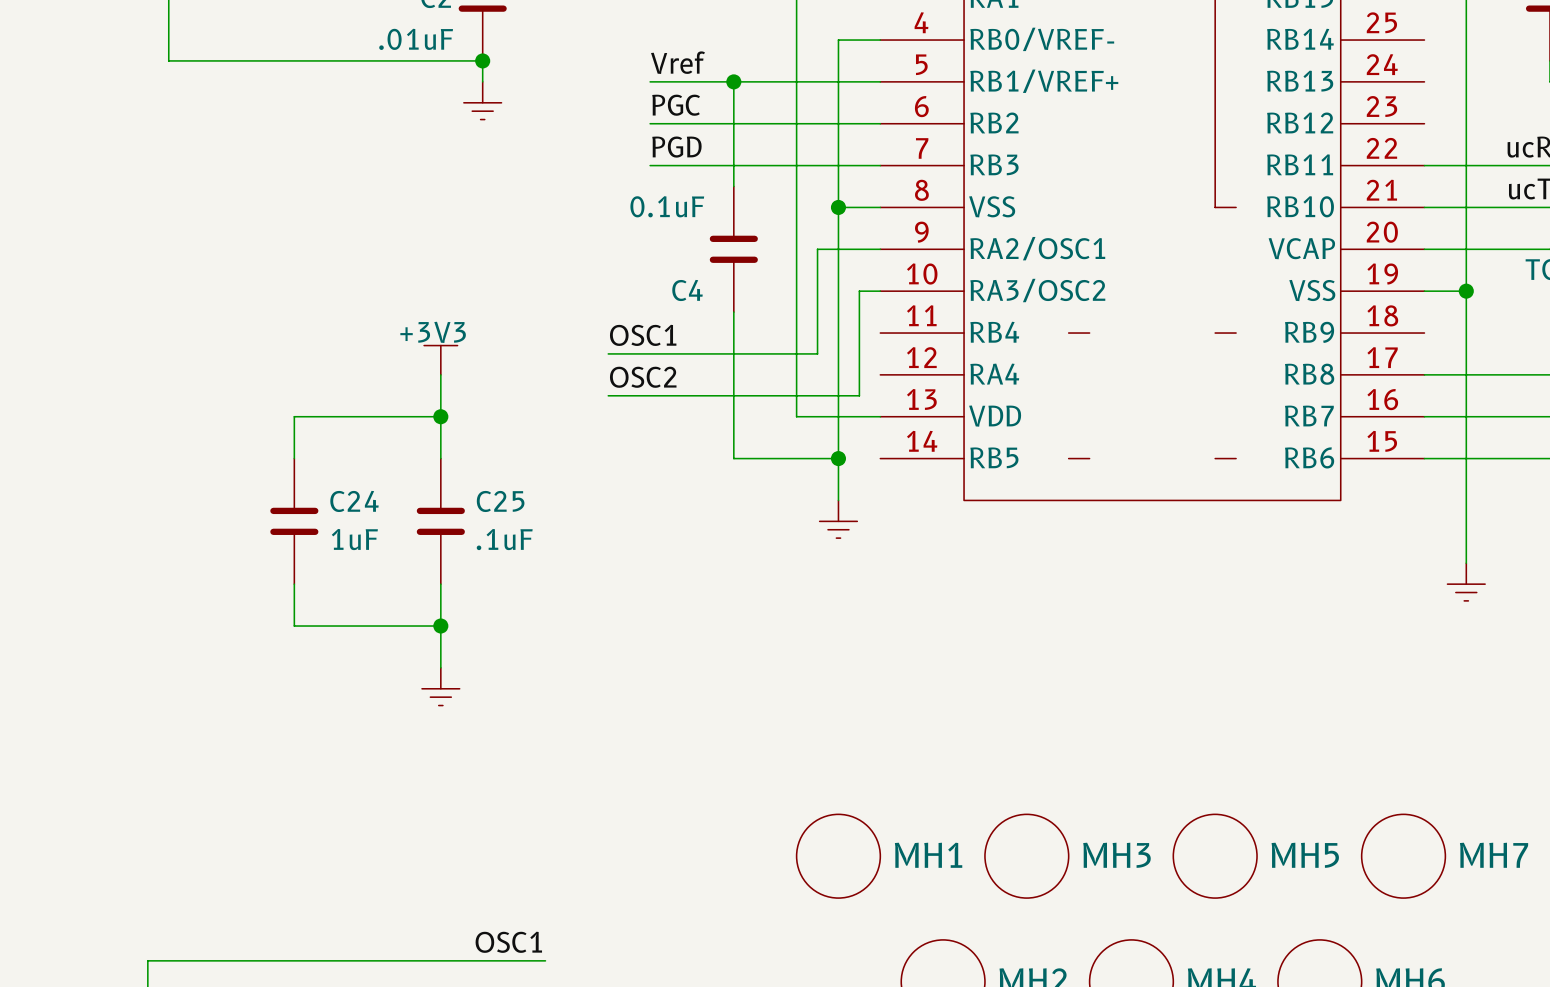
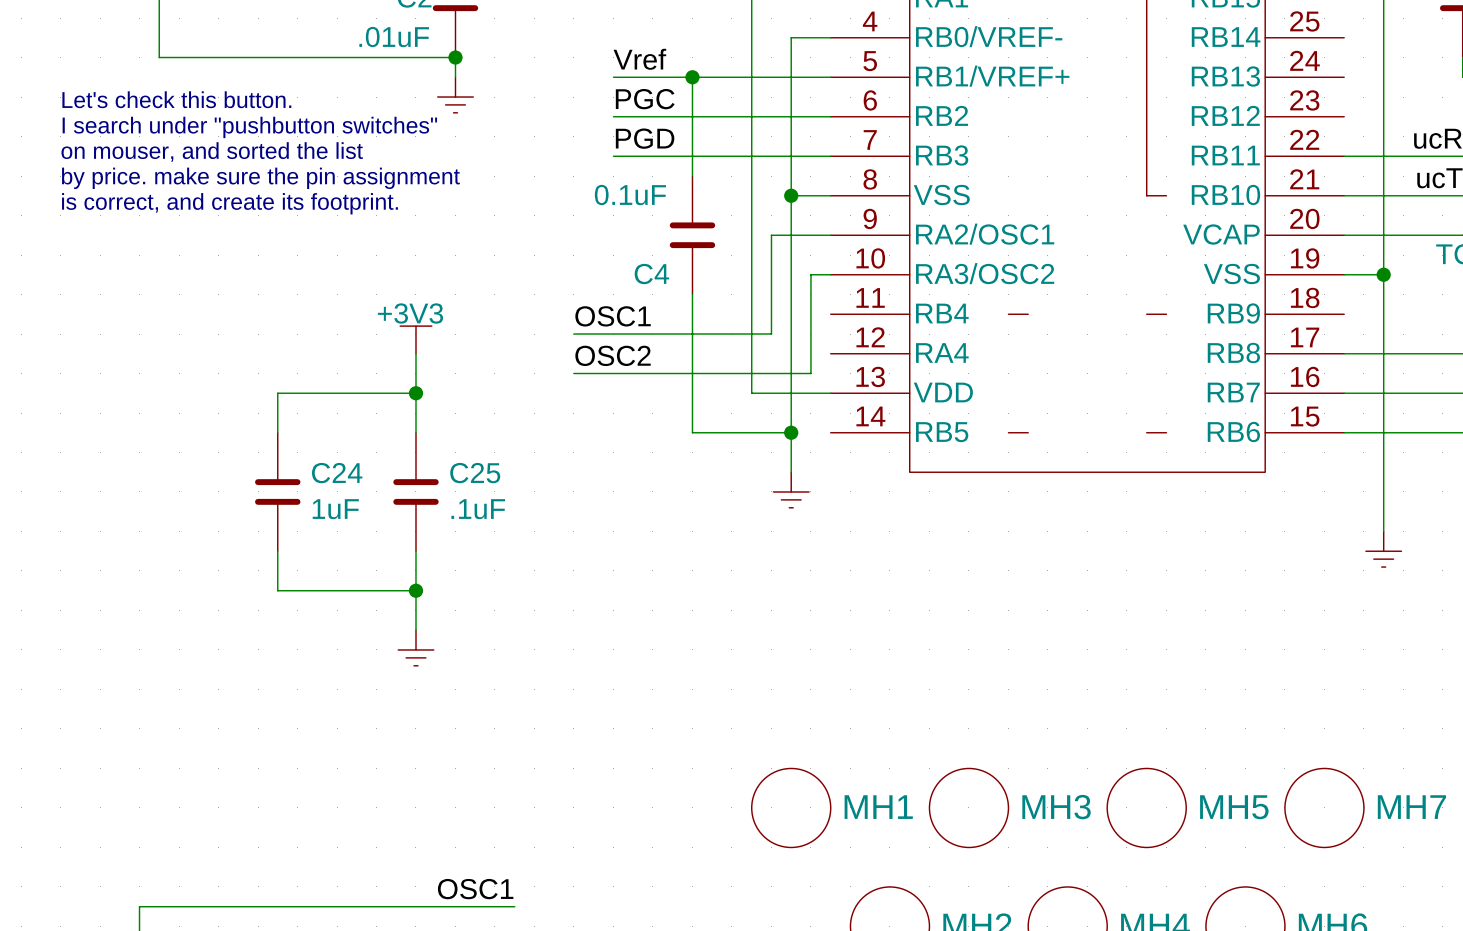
text: none -> Let's check this button. (176, 99)
text: none -> I search under "pushbutton switches" (249, 127)
text: none -> on mouser, and sorted the list (212, 151)
text: none -> by price. make sure the pin assignment (260, 178)
text: none -> is correct, and create its footprint. (229, 203)

